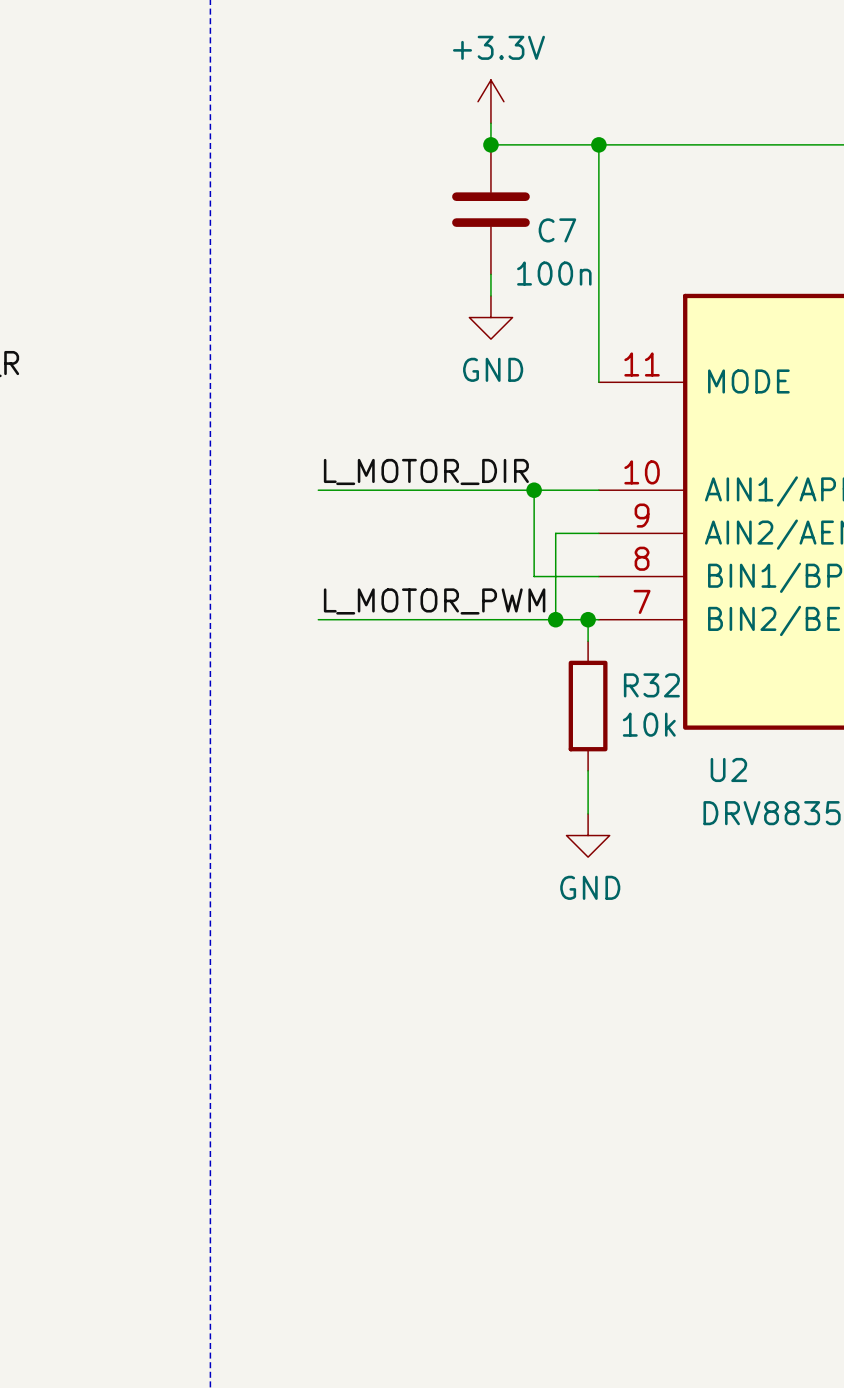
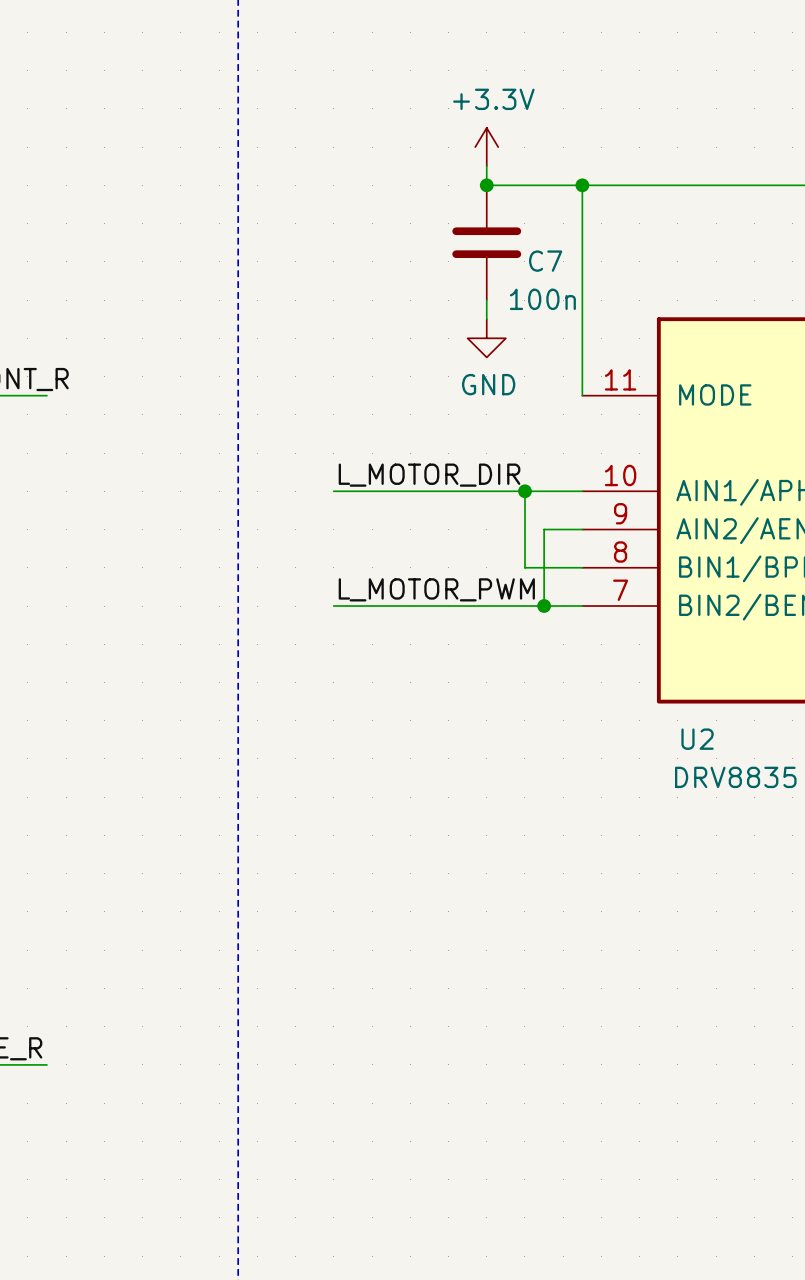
wire: (588, 619) (588, 641) -> none
junction: (588, 619) -> none
R32: 10k (588, 706) -> none
wire: (588, 770) (588, 813) -> none
power symbol: GND (588, 835) -> none

